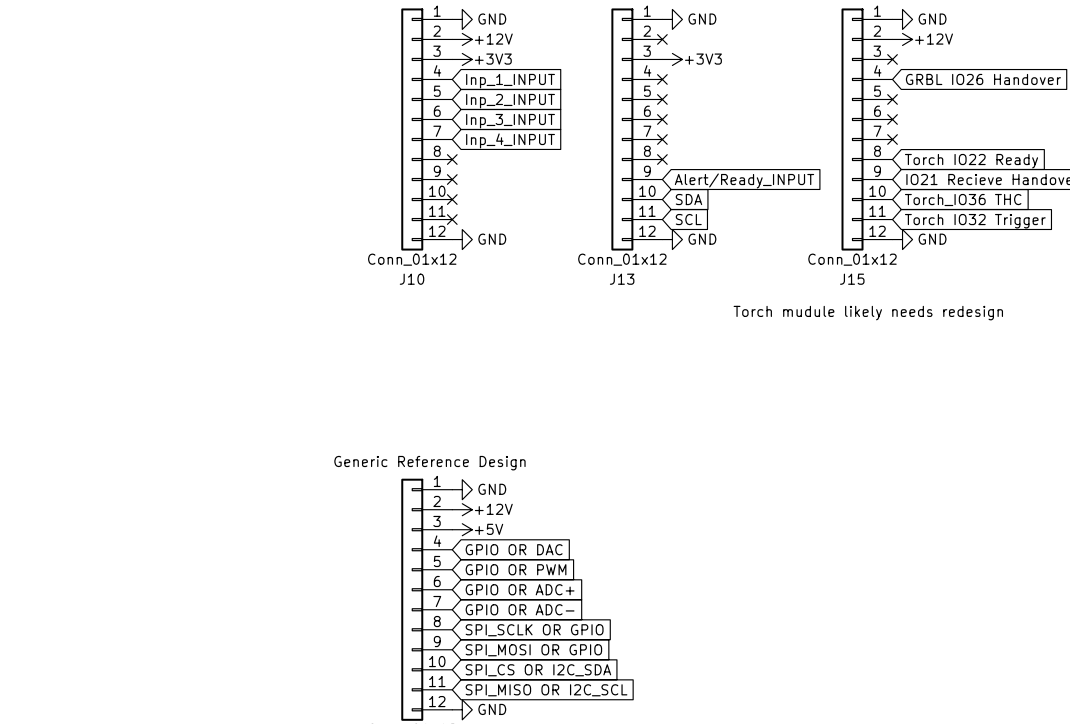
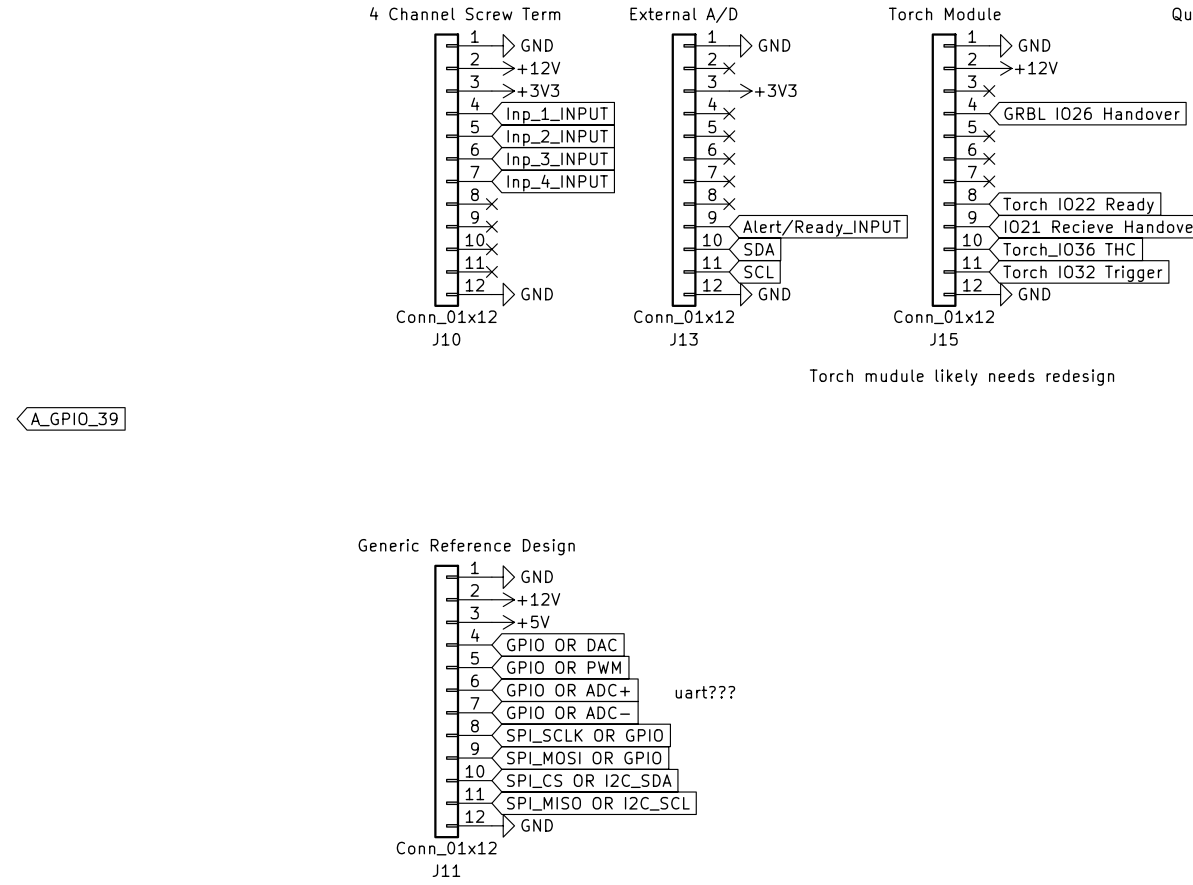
global label: none -> A_GPIO_39 (74, 419)
text: none -> uart??? (705, 692)

